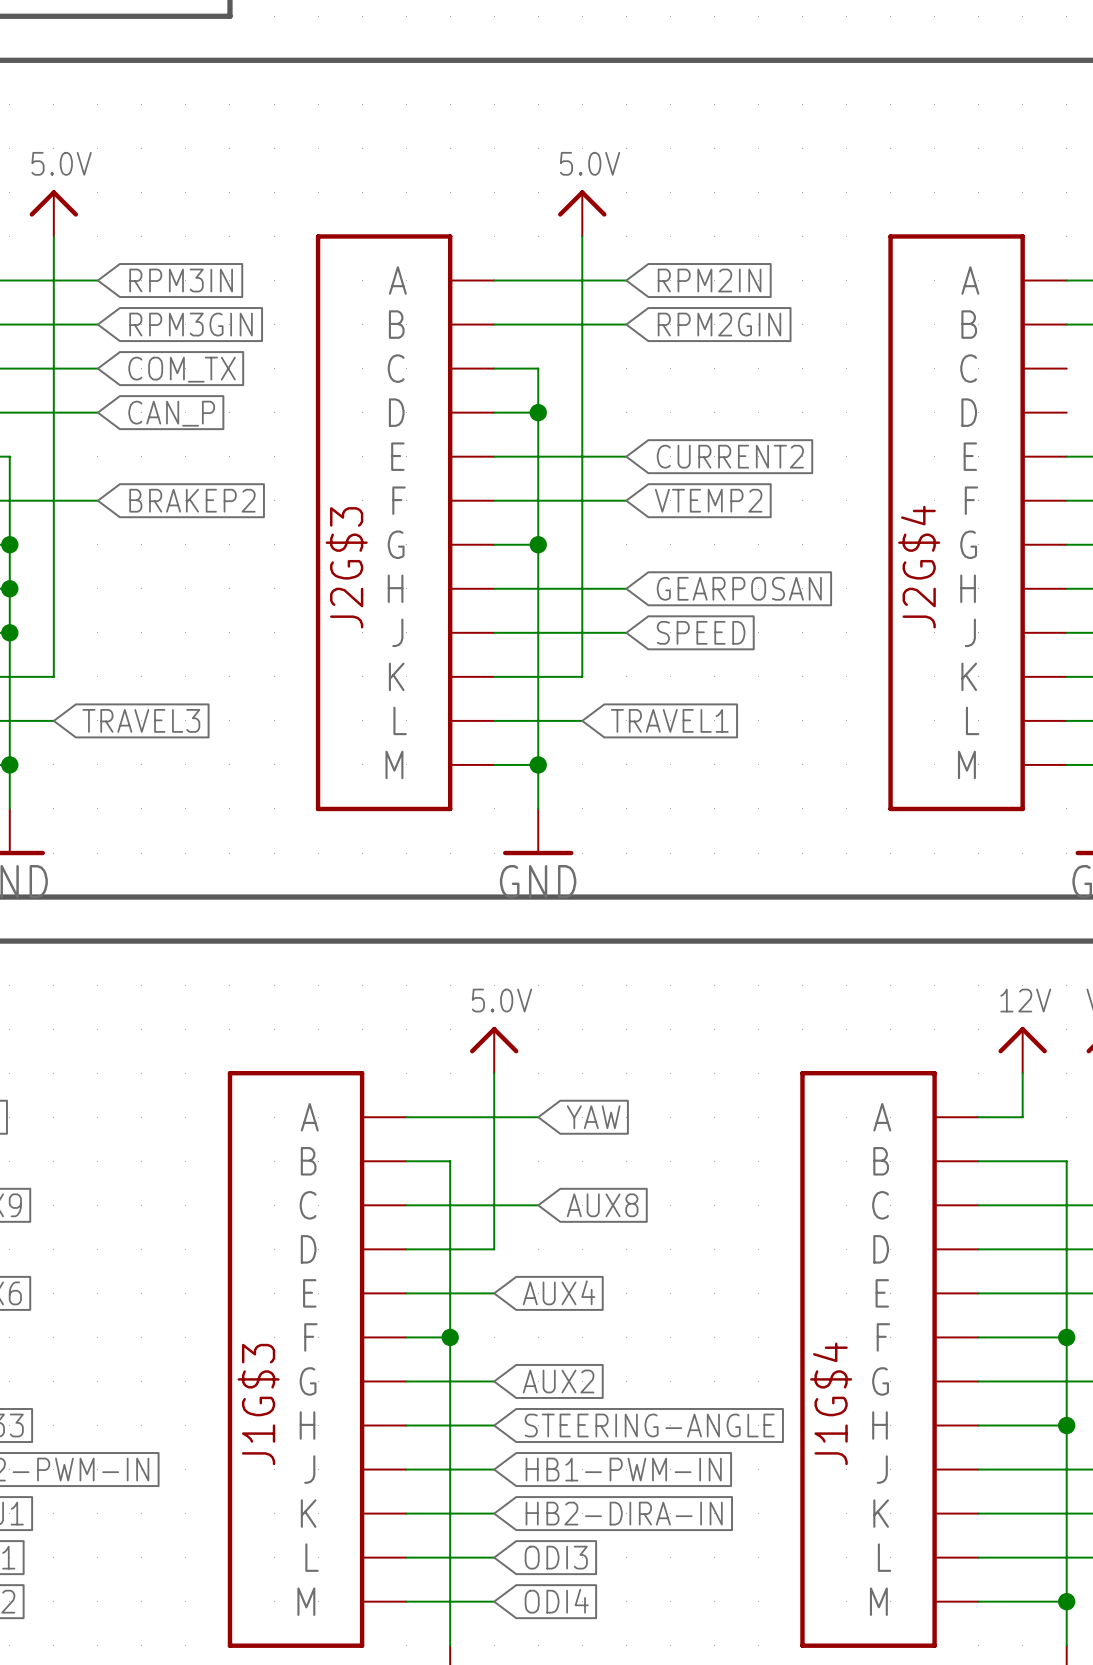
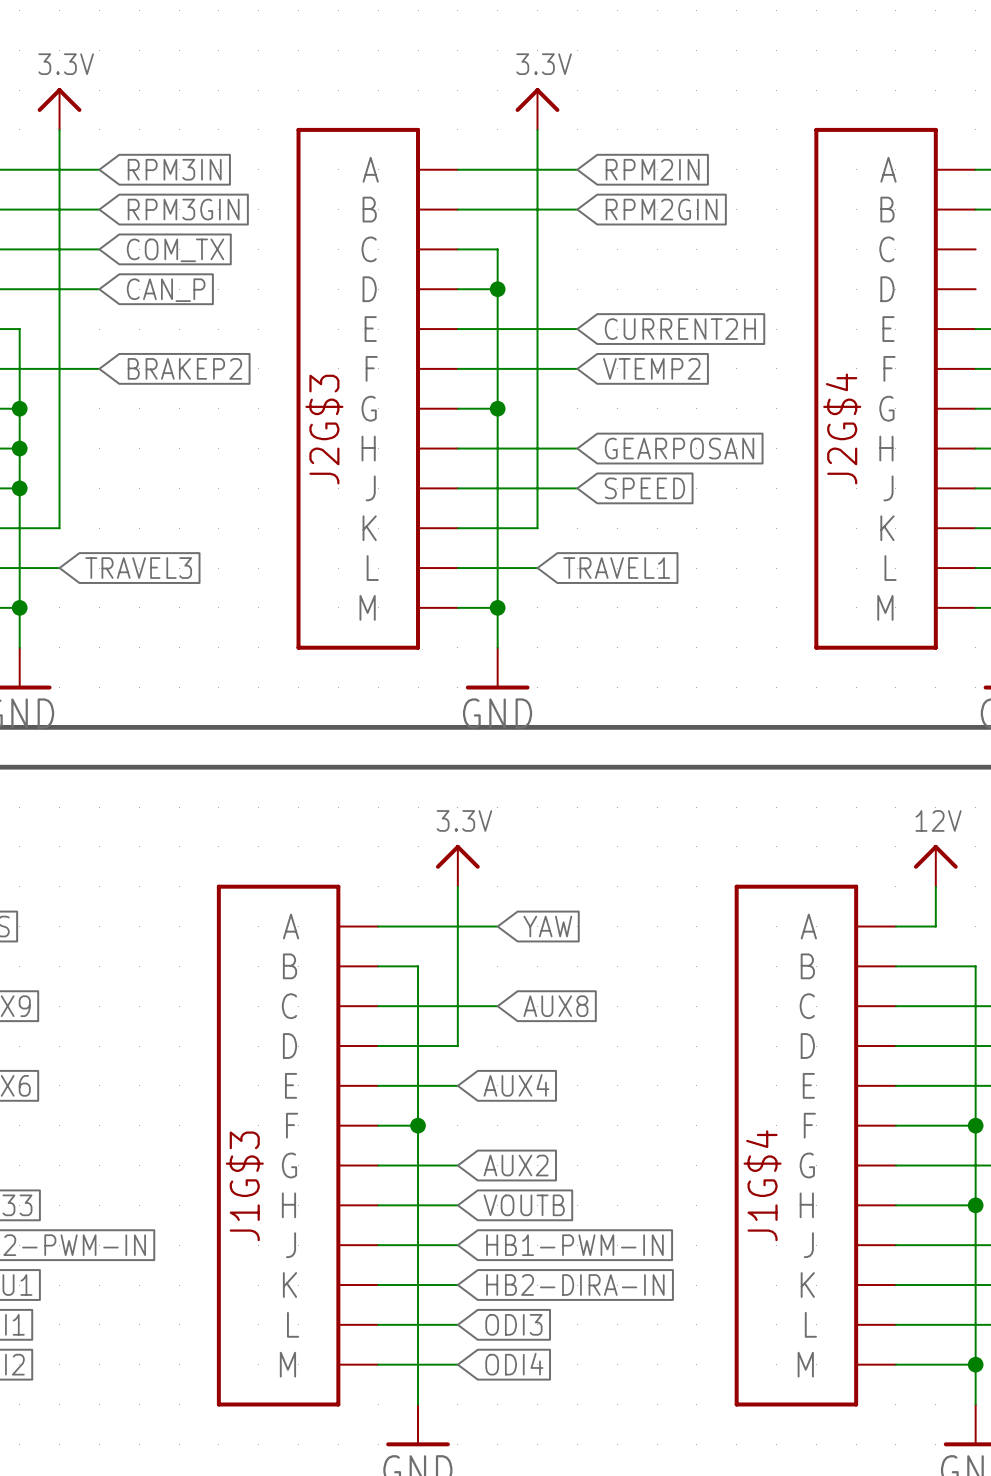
power symbol: 5.0V (53, 213) -> 3.3V (59, 108)
power symbol: 5.0V (582, 213) -> 3.3V (537, 108)
global label: CURRENT2 (730, 456) -> CURRENT2H (680, 329)
power symbol: 5.0V (494, 1050) -> 3.3V (457, 865)
global label: STEERING-ANGLE (649, 1425) -> VOUTB (524, 1205)

